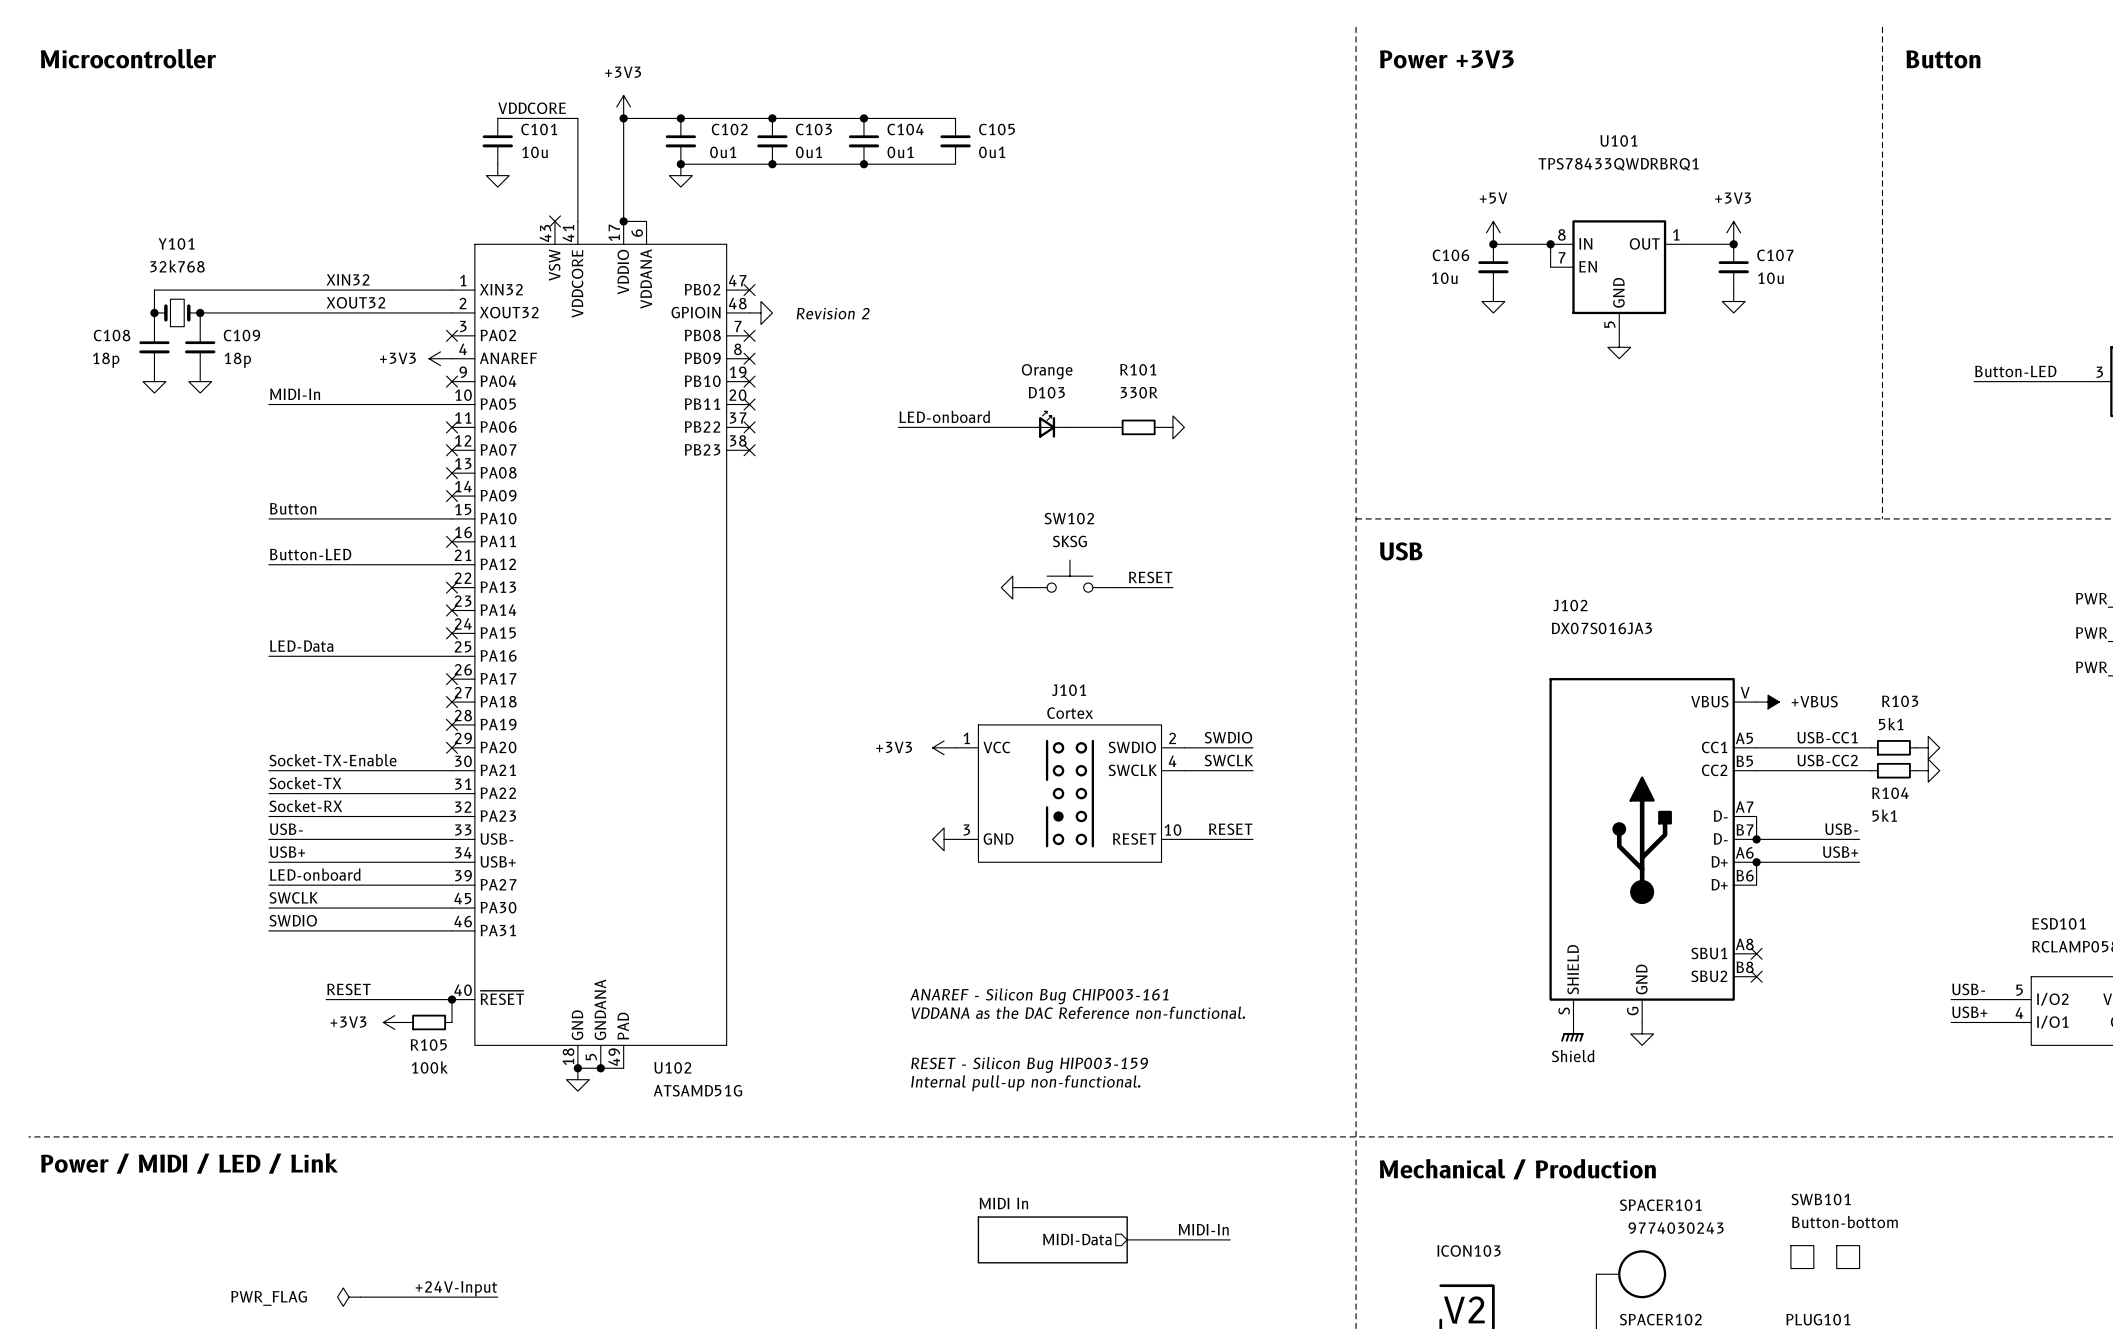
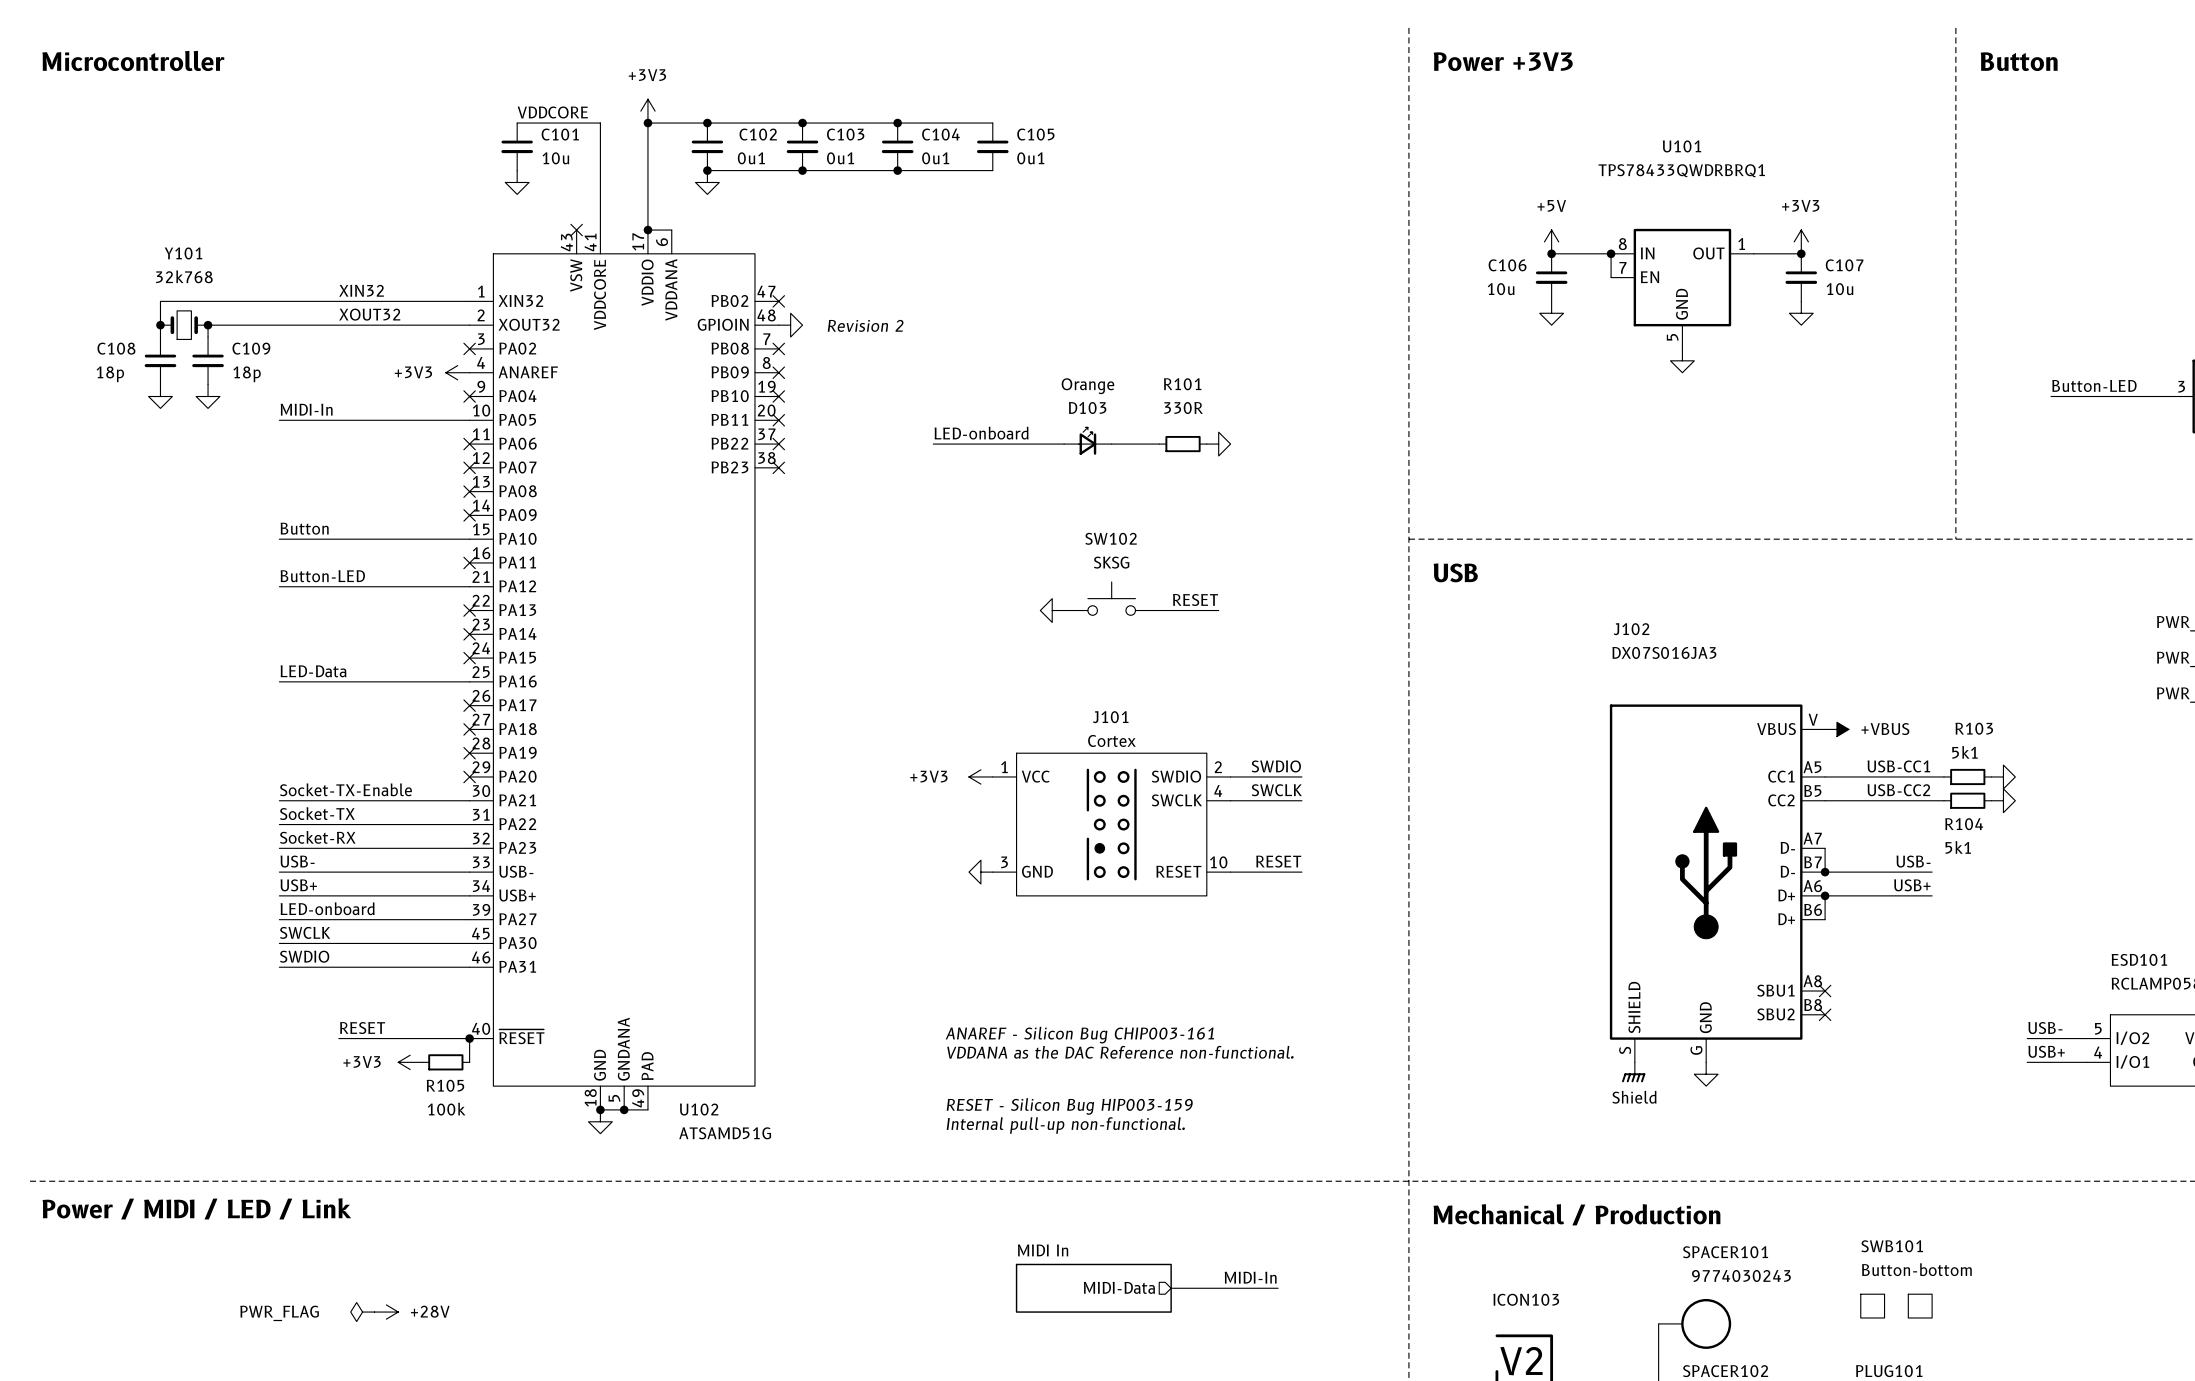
power symbol: none -> +28V (386, 1312)
label: +24V-Input (456, 1288) -> none
power symbol position: PWR_FLAG (349, 1297) -> PWR_FLAG (362, 1312)
wire: (360, 1297) (497, 1297) -> none

